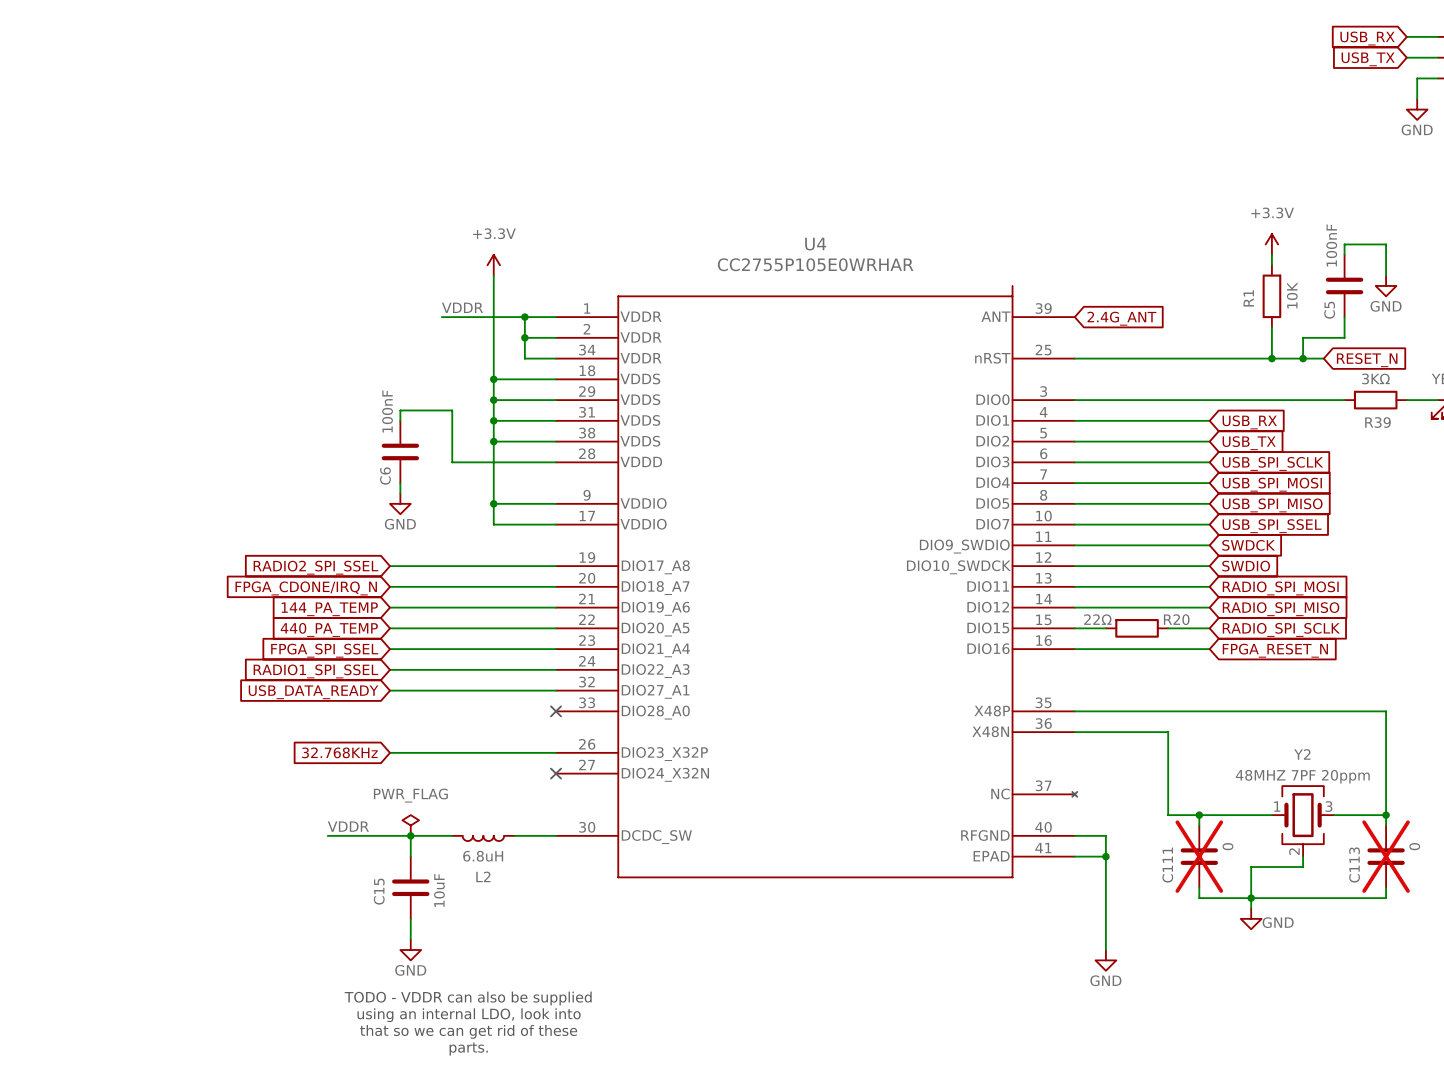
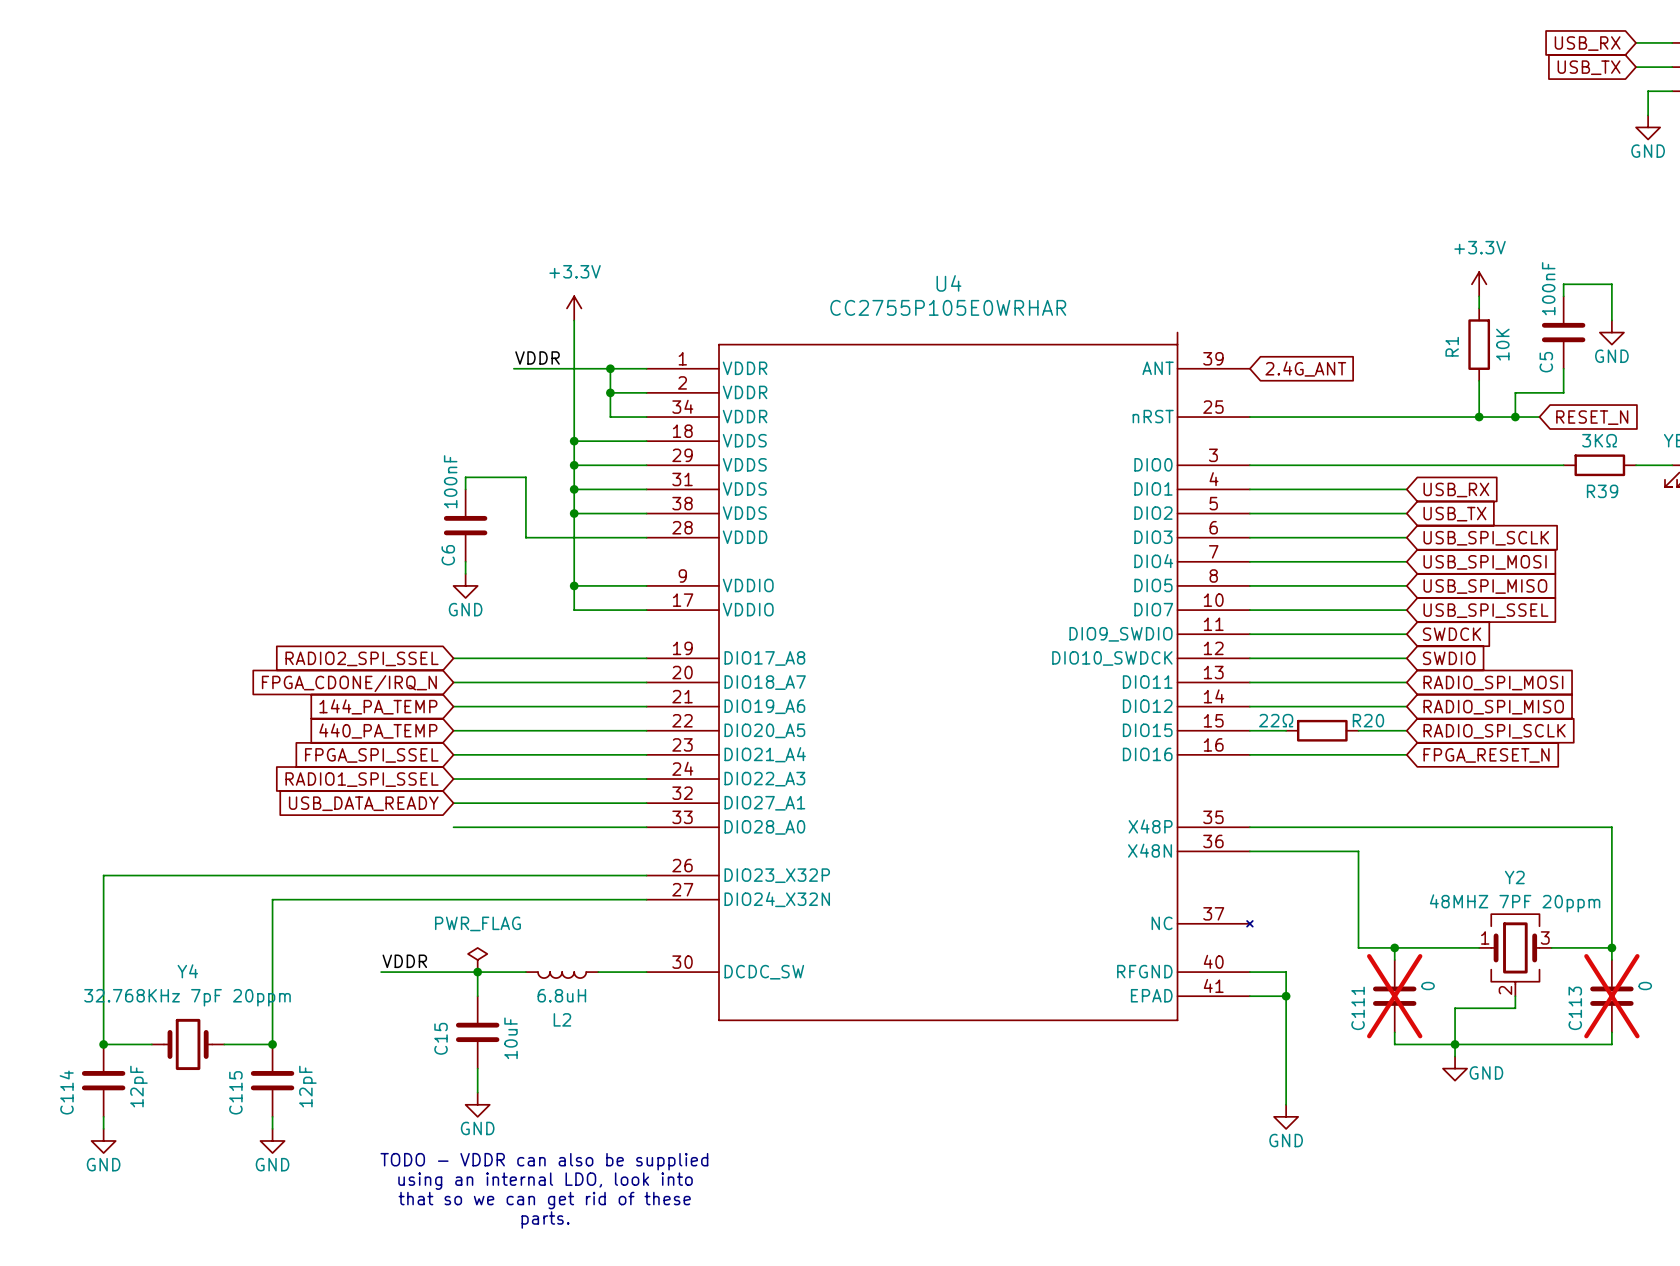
wire: none -> (453, 827) (646, 827)
no-connect mark: (556, 711) -> none
global label: 32.768KHz (339, 752) -> none
wire: none -> (453, 875) (103, 875) (103, 1044) (151, 1044)
wire: none -> (646, 899) (272, 899) (272, 1044) (224, 1044)
no-connect mark: (556, 773) -> none
junction: none -> (103, 1044)
Y4: none -> 32.768KHz 7pF 20ppm (188, 1044)
junction: none -> (272, 1044)
C114: none -> 12pF (103, 1080)
C115: none -> 12pF (272, 1080)
wire: none -> (103, 1116) (103, 1128)
wire: none -> (272, 1116) (272, 1128)
power symbol: none -> GND (103, 1140)
power symbol: none -> GND (272, 1140)

